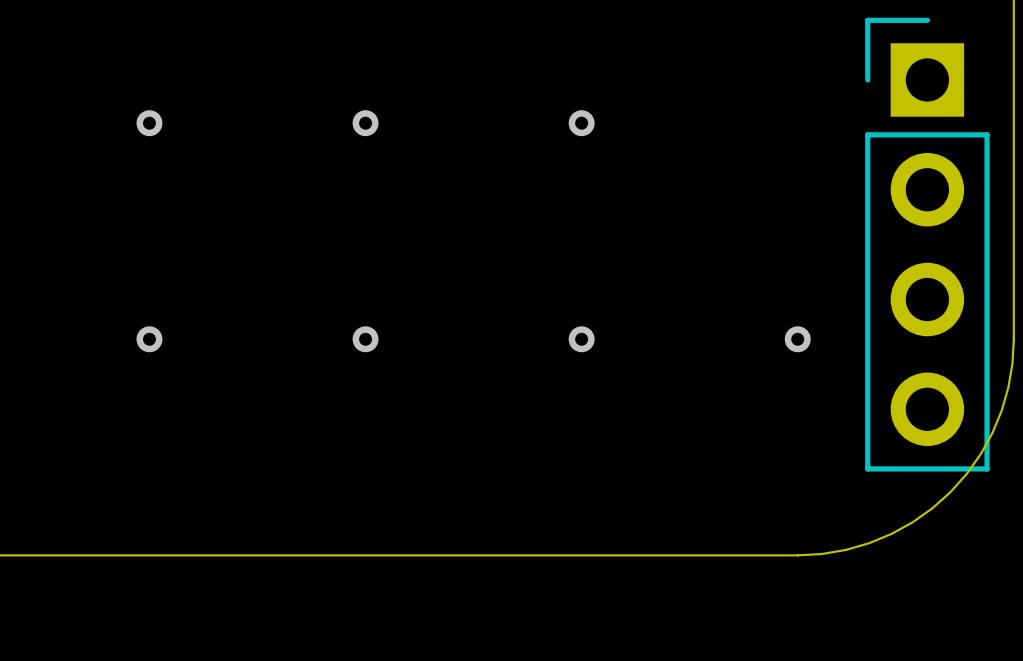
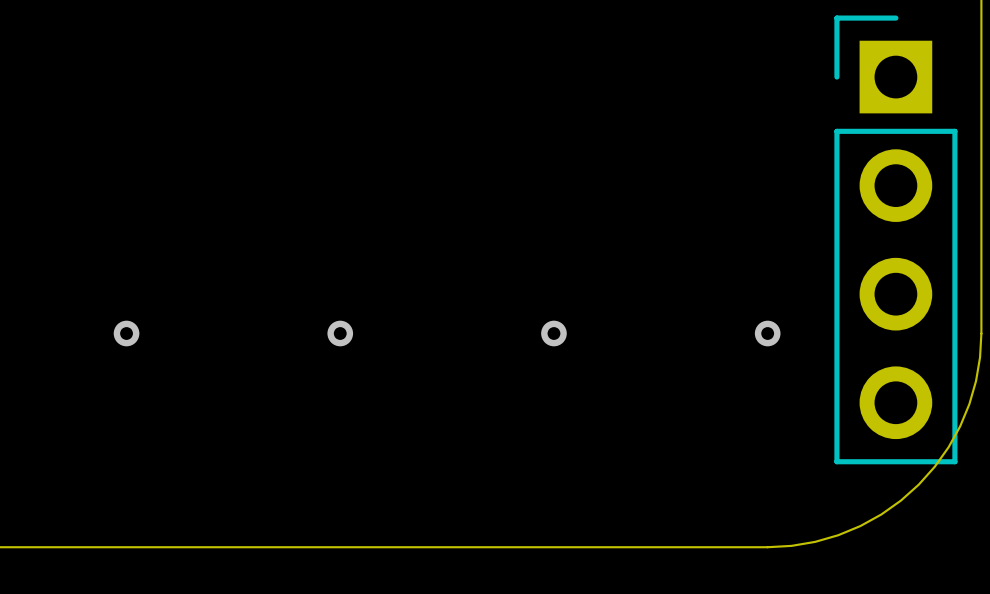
via: (149, 123) -> none
via: (365, 123) -> none
via: (581, 123) -> none

